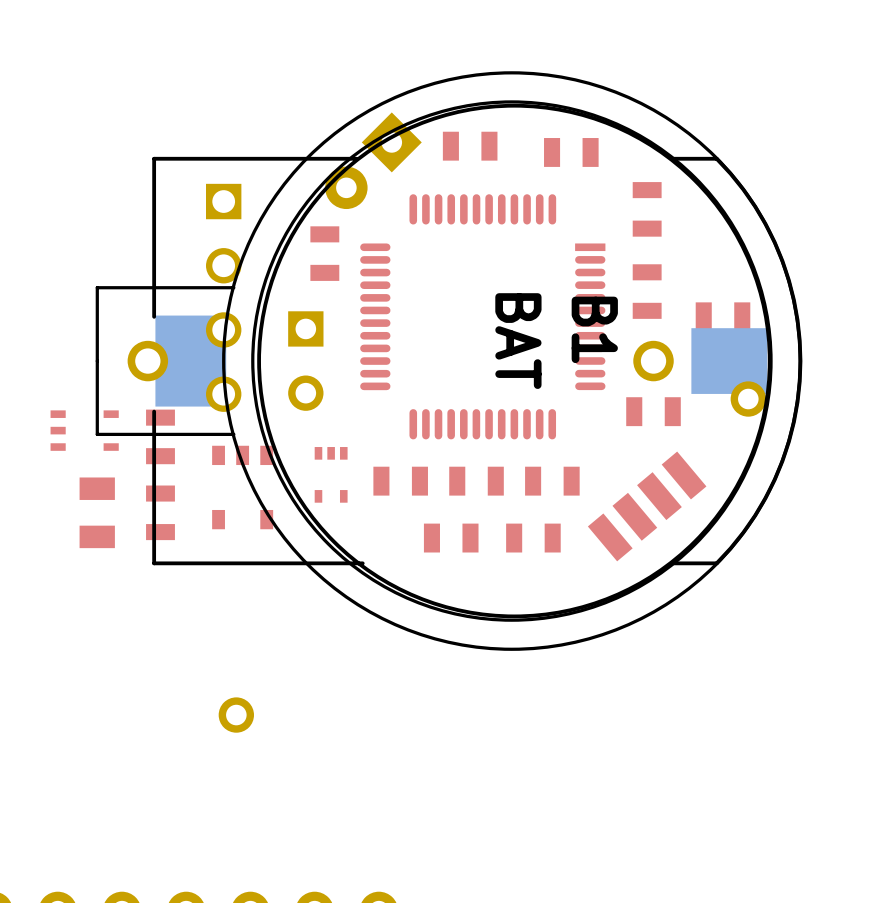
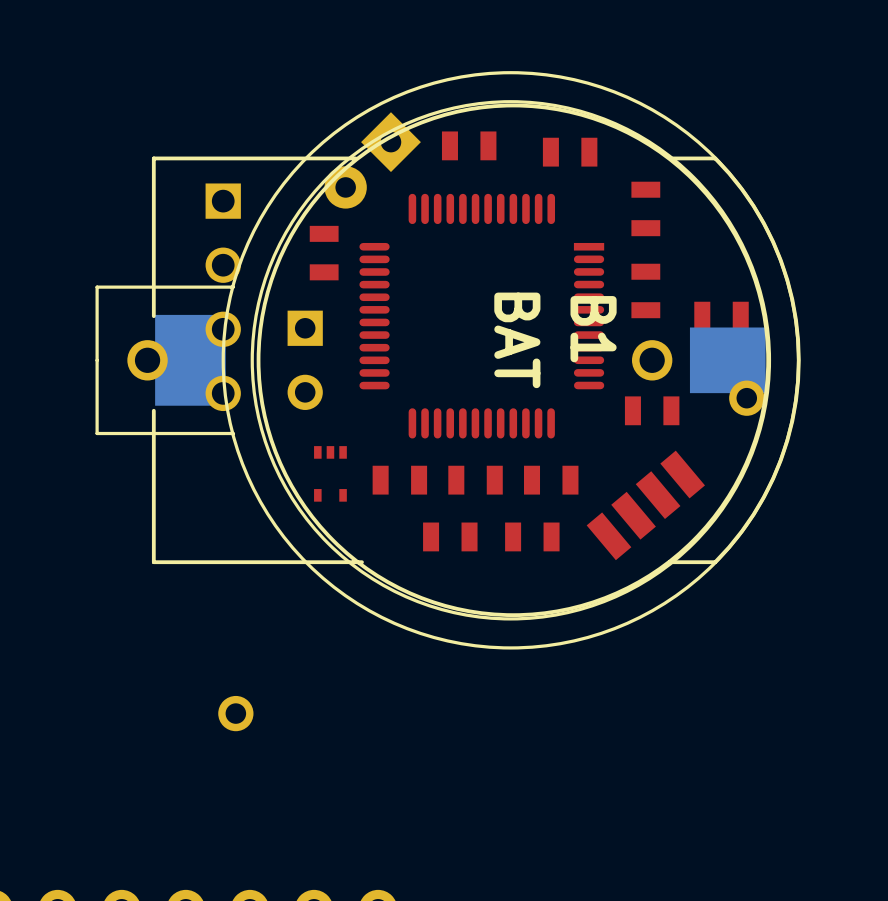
part: (84, 430) -> none
part: (160, 436) -> none
part: (242, 487) -> none
part: (97, 512) -> none
part: (160, 512) -> none

